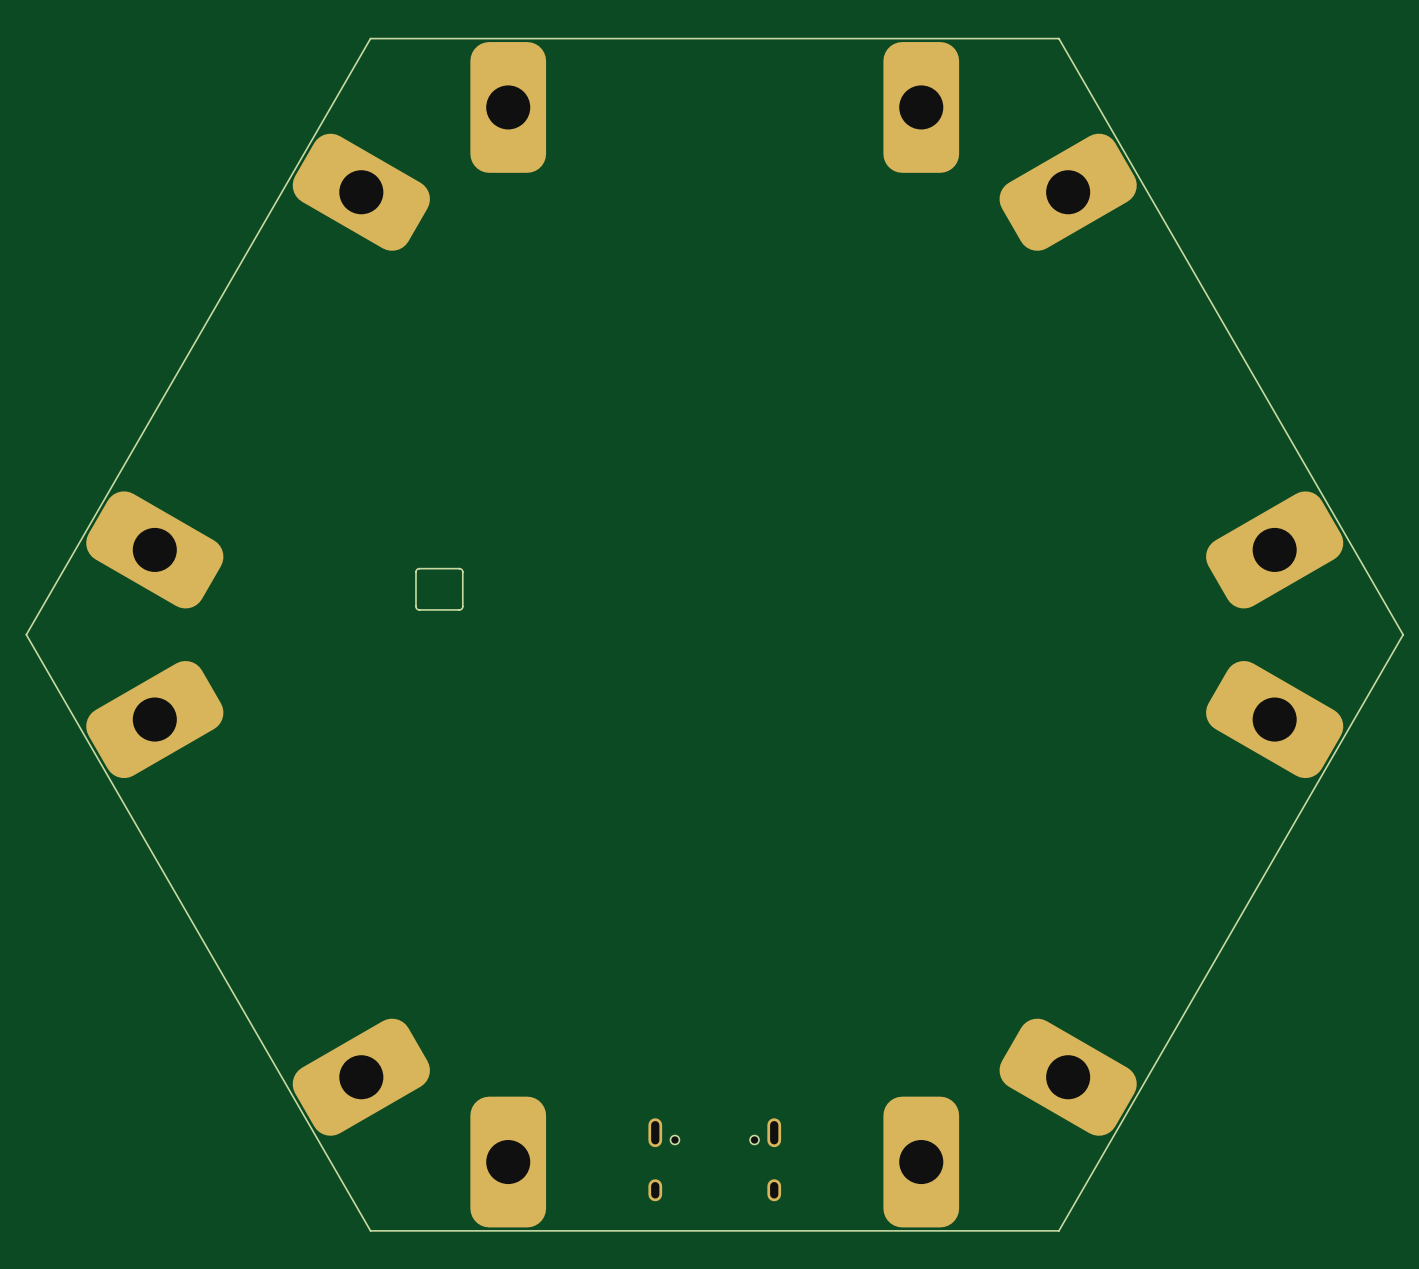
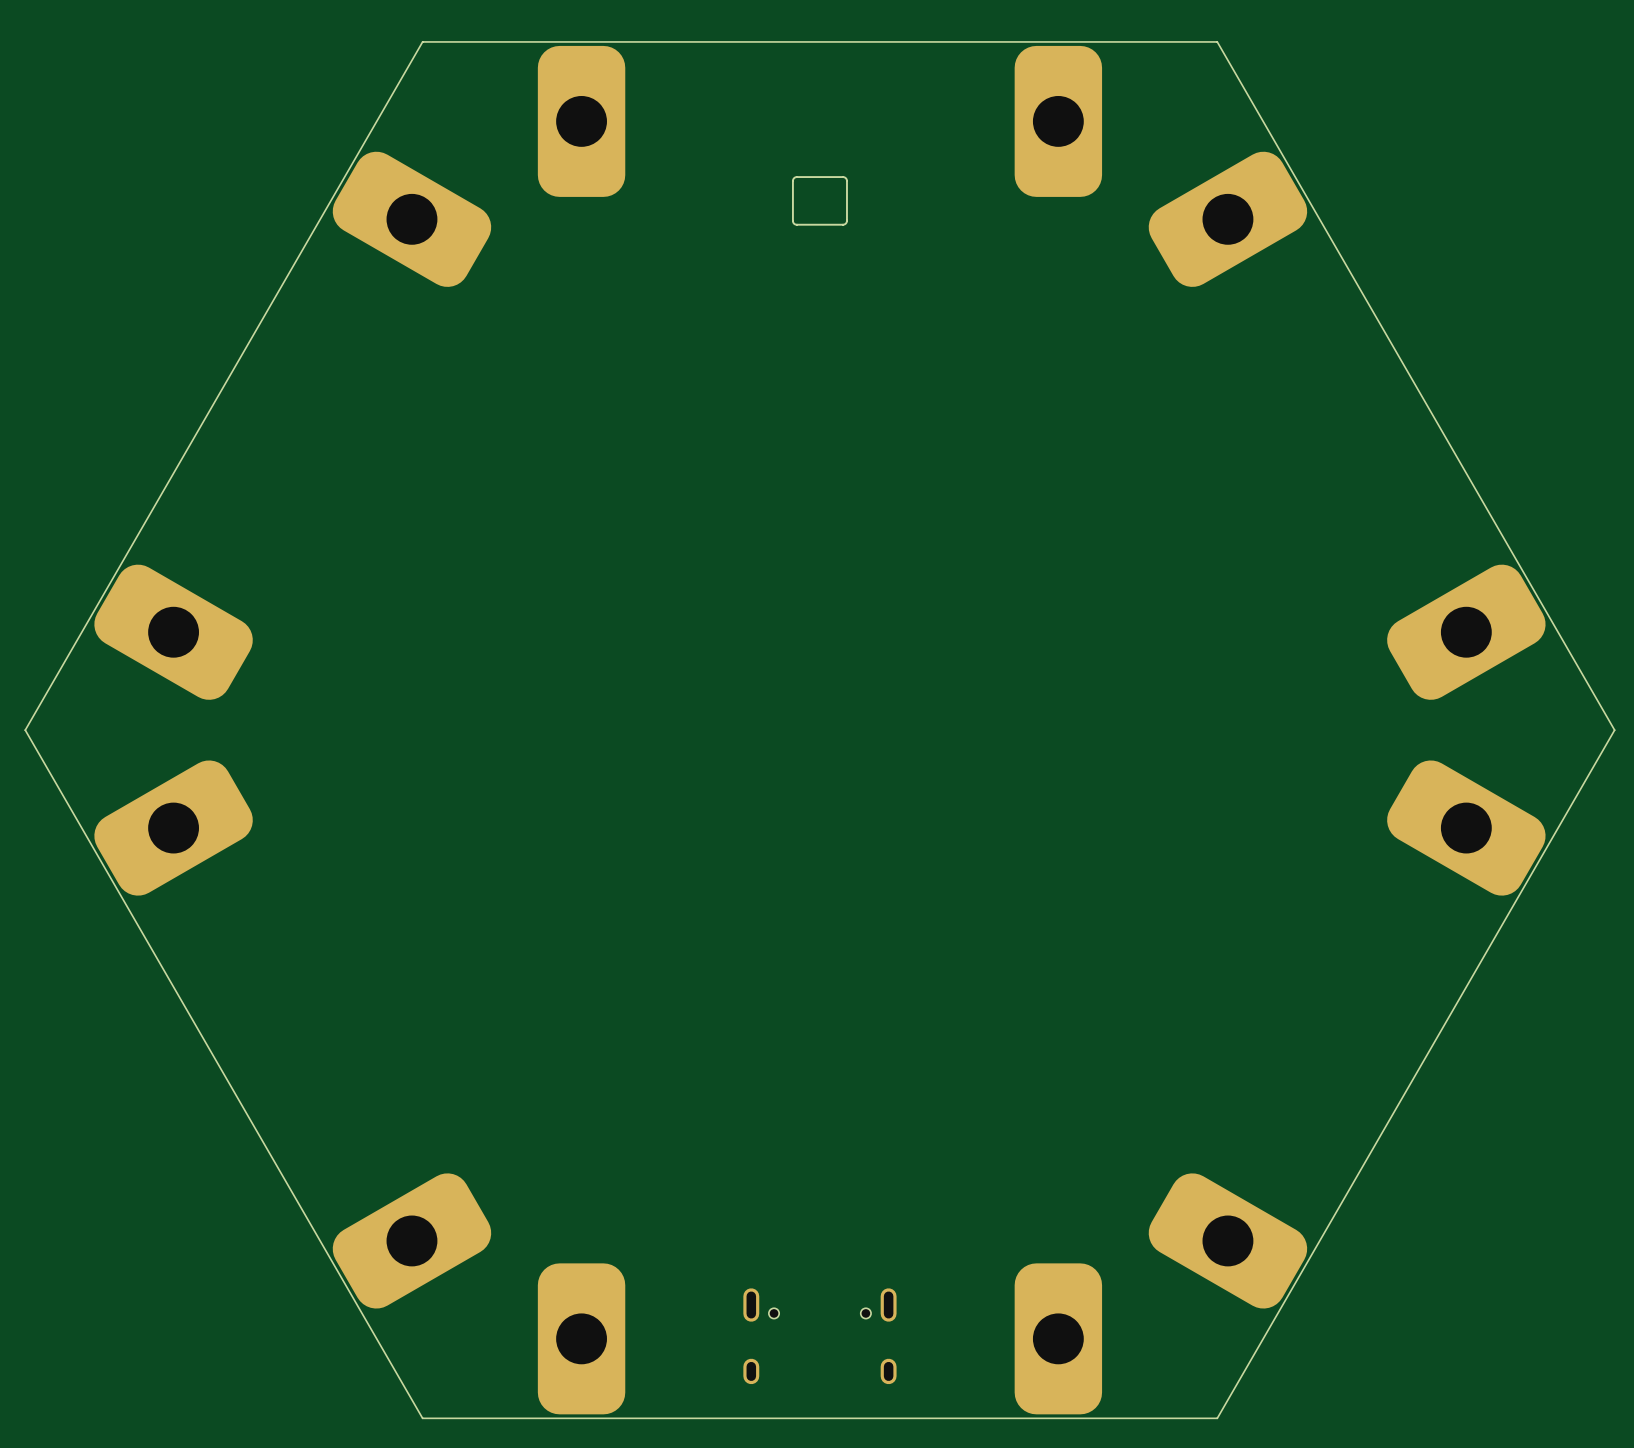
part: none -> (819, 200)
part: (439, 589) -> none

